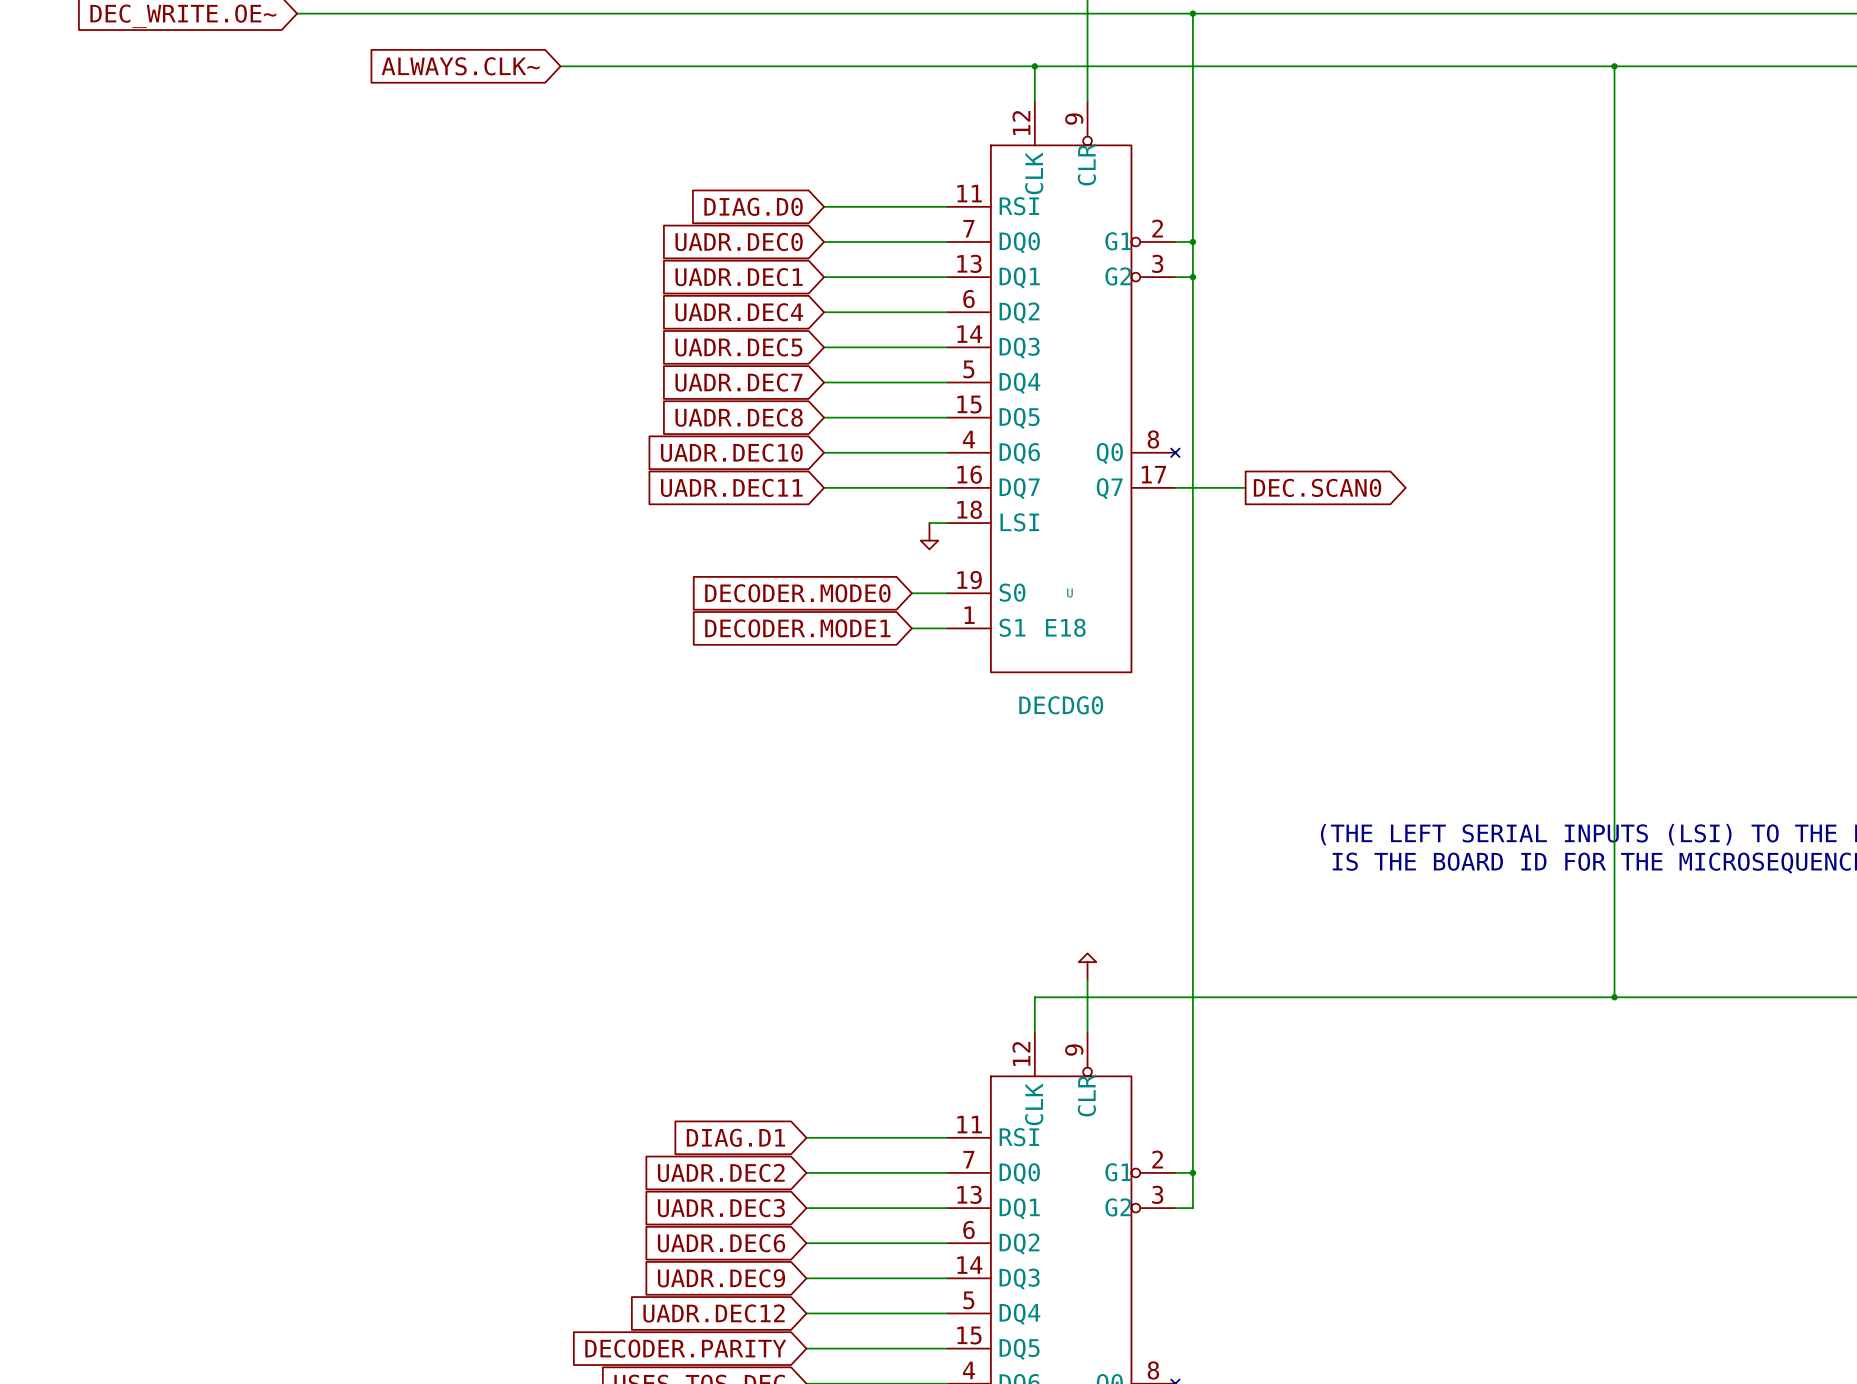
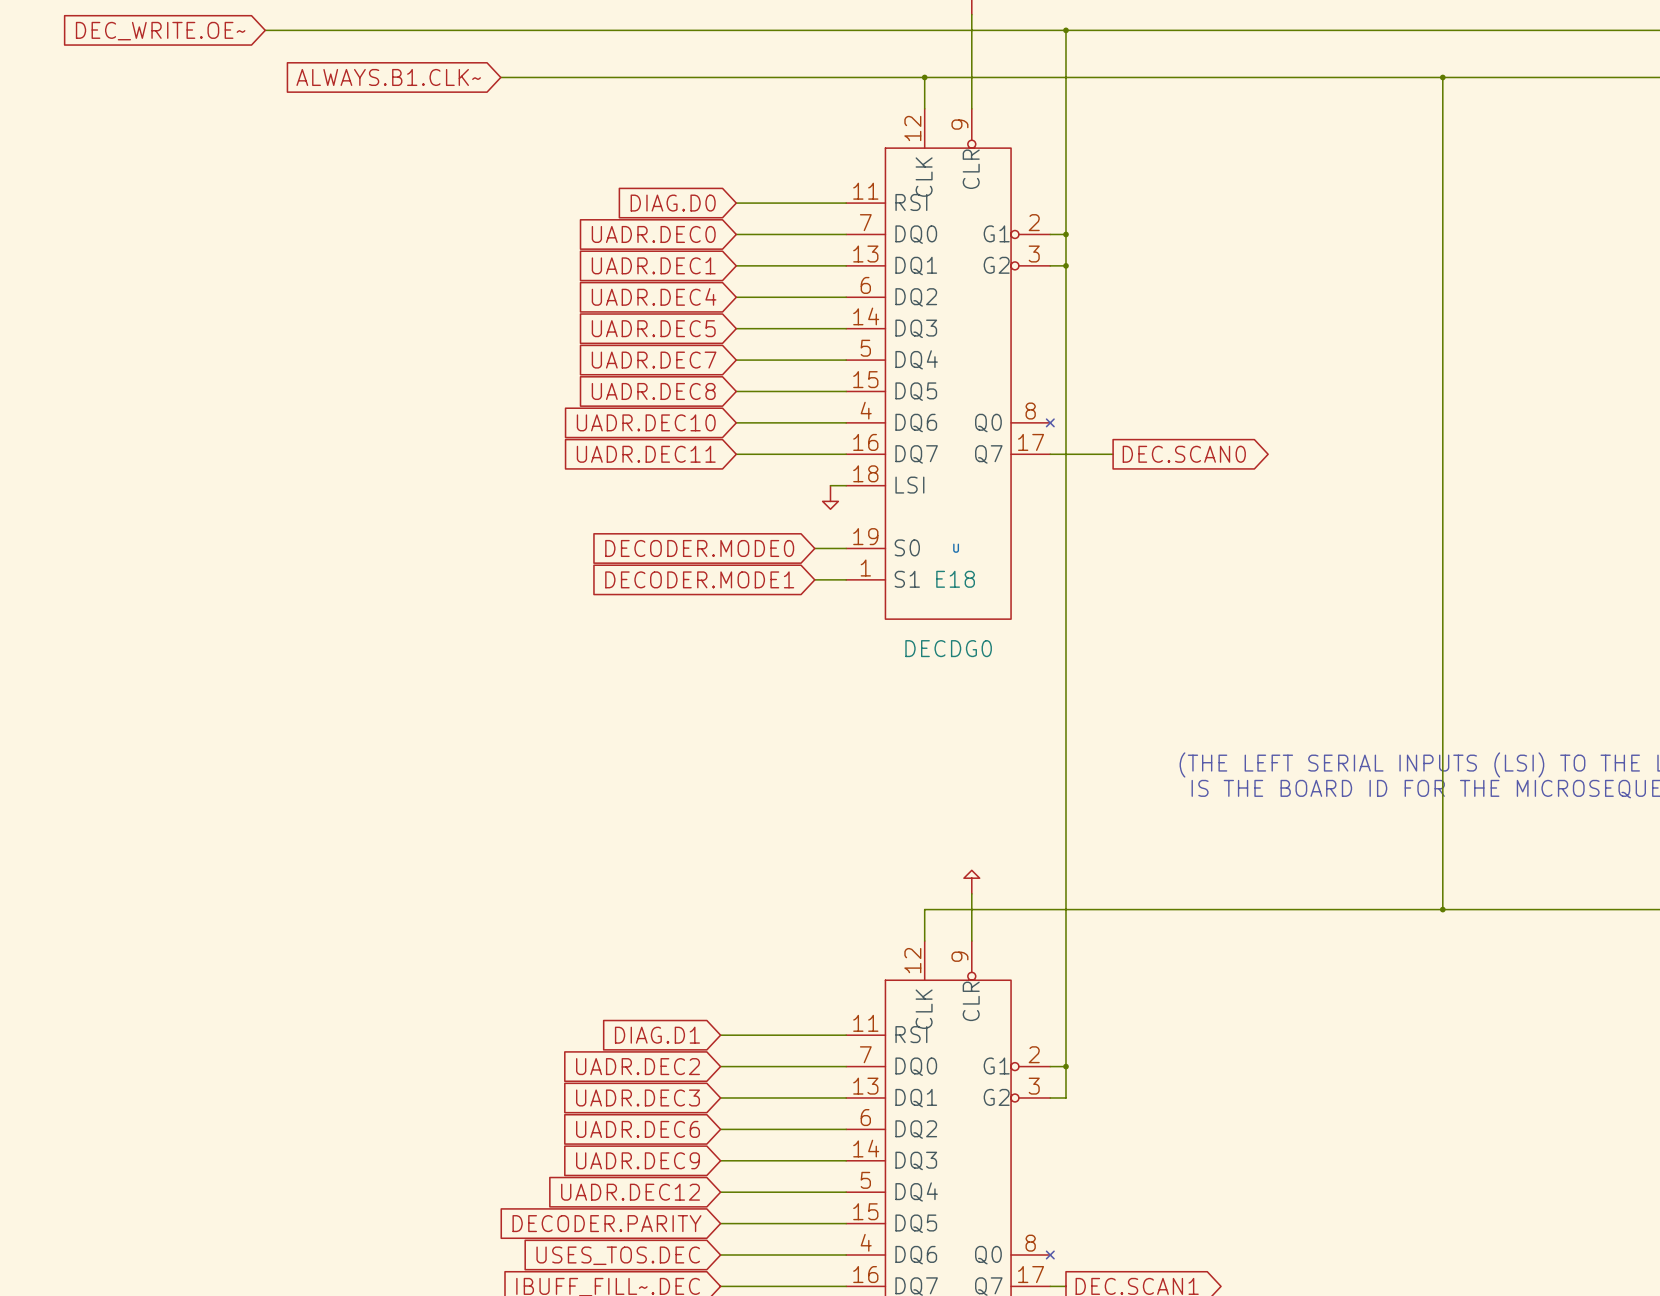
global label: ALWAYS.CLK~ (460, 66) -> ALWAYS.B1.CLK~ (388, 77)

